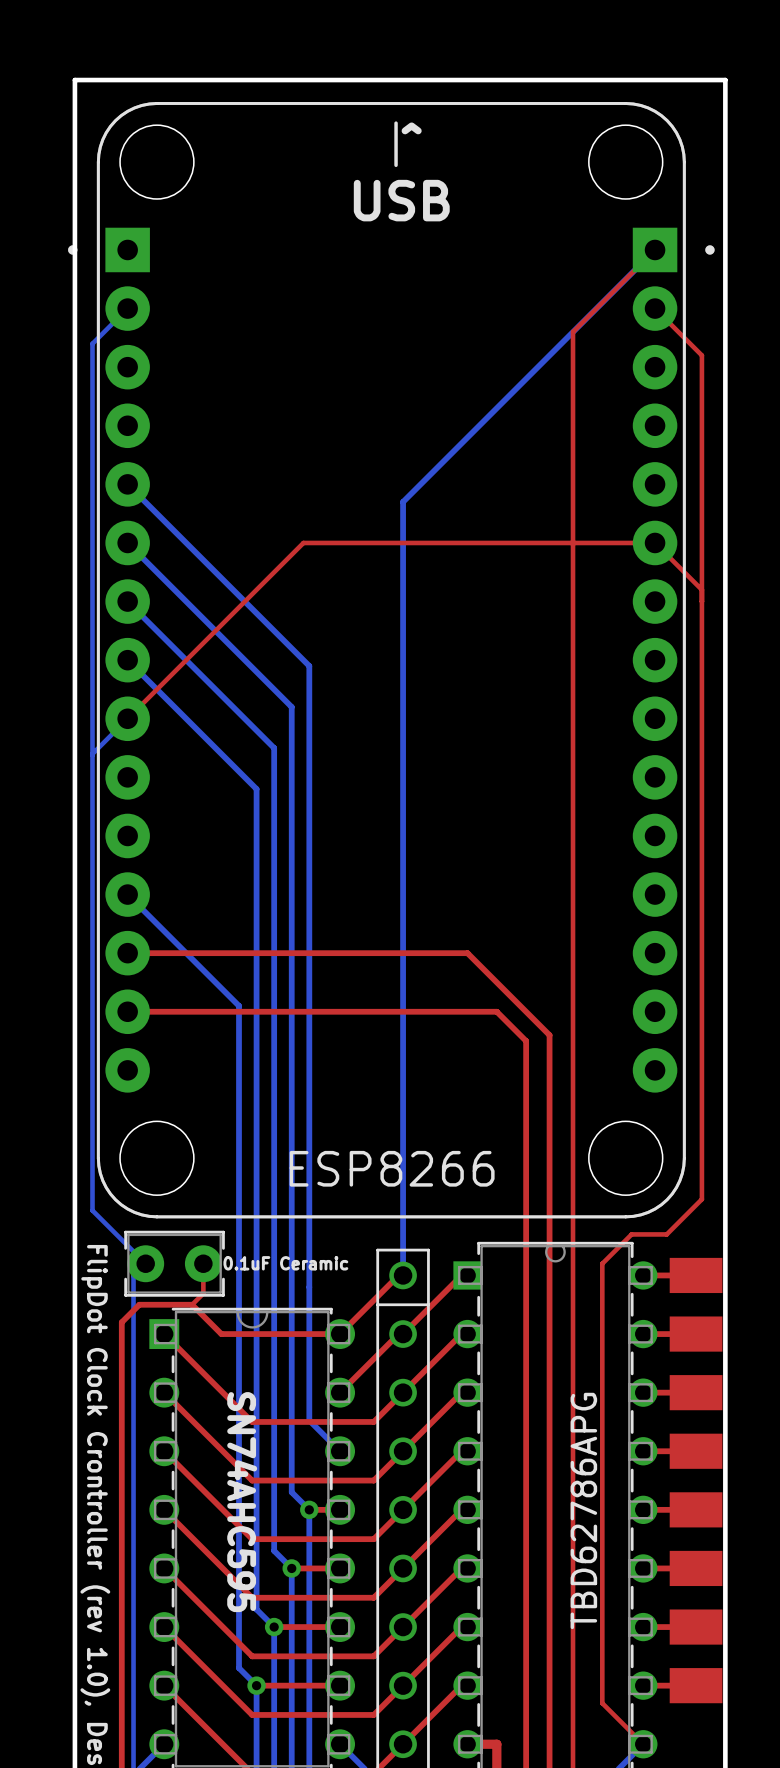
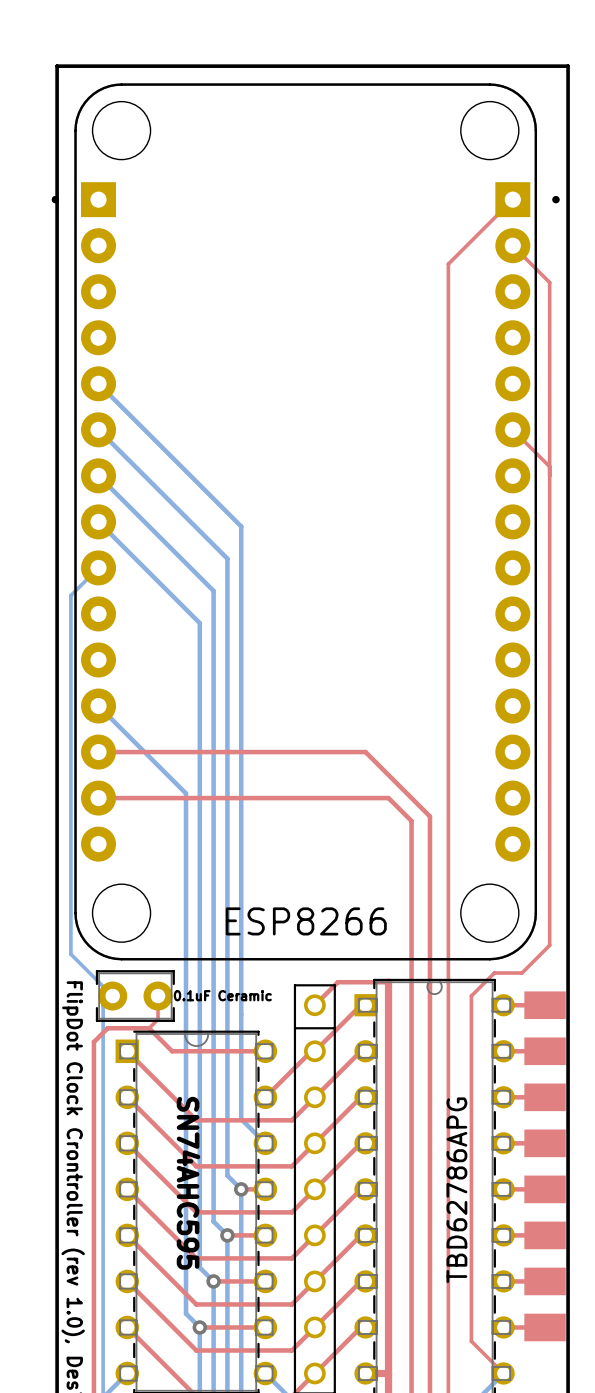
line: (396, 123) (396, 165) -> none
text: ^ (411, 128) -> none
text: USB (401, 200) -> none
bottom track: (655, 249) (403, 501) (403, 1275) -> none
bottom track: (127, 308) (92, 343) (92, 753) -> none
top track: (655, 542) (303, 542) (127, 718) -> none
top track: (403, 1275) (398, 1275) (340, 1334) -> (314, 1005) (337, 982) (388, 982) (388, 1373)

